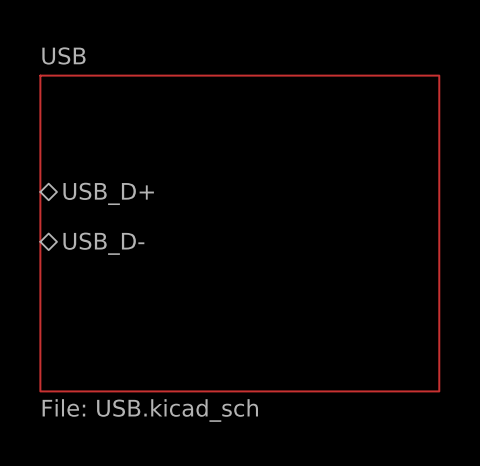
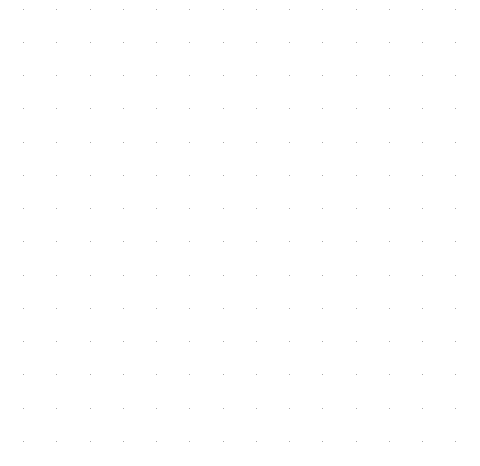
sheet pin: USB_D+ (108, 193) -> none
sheet USB: File: USB.kicad_sch (239, 233) -> none
sheet pin: USB_D- (103, 243) -> none

